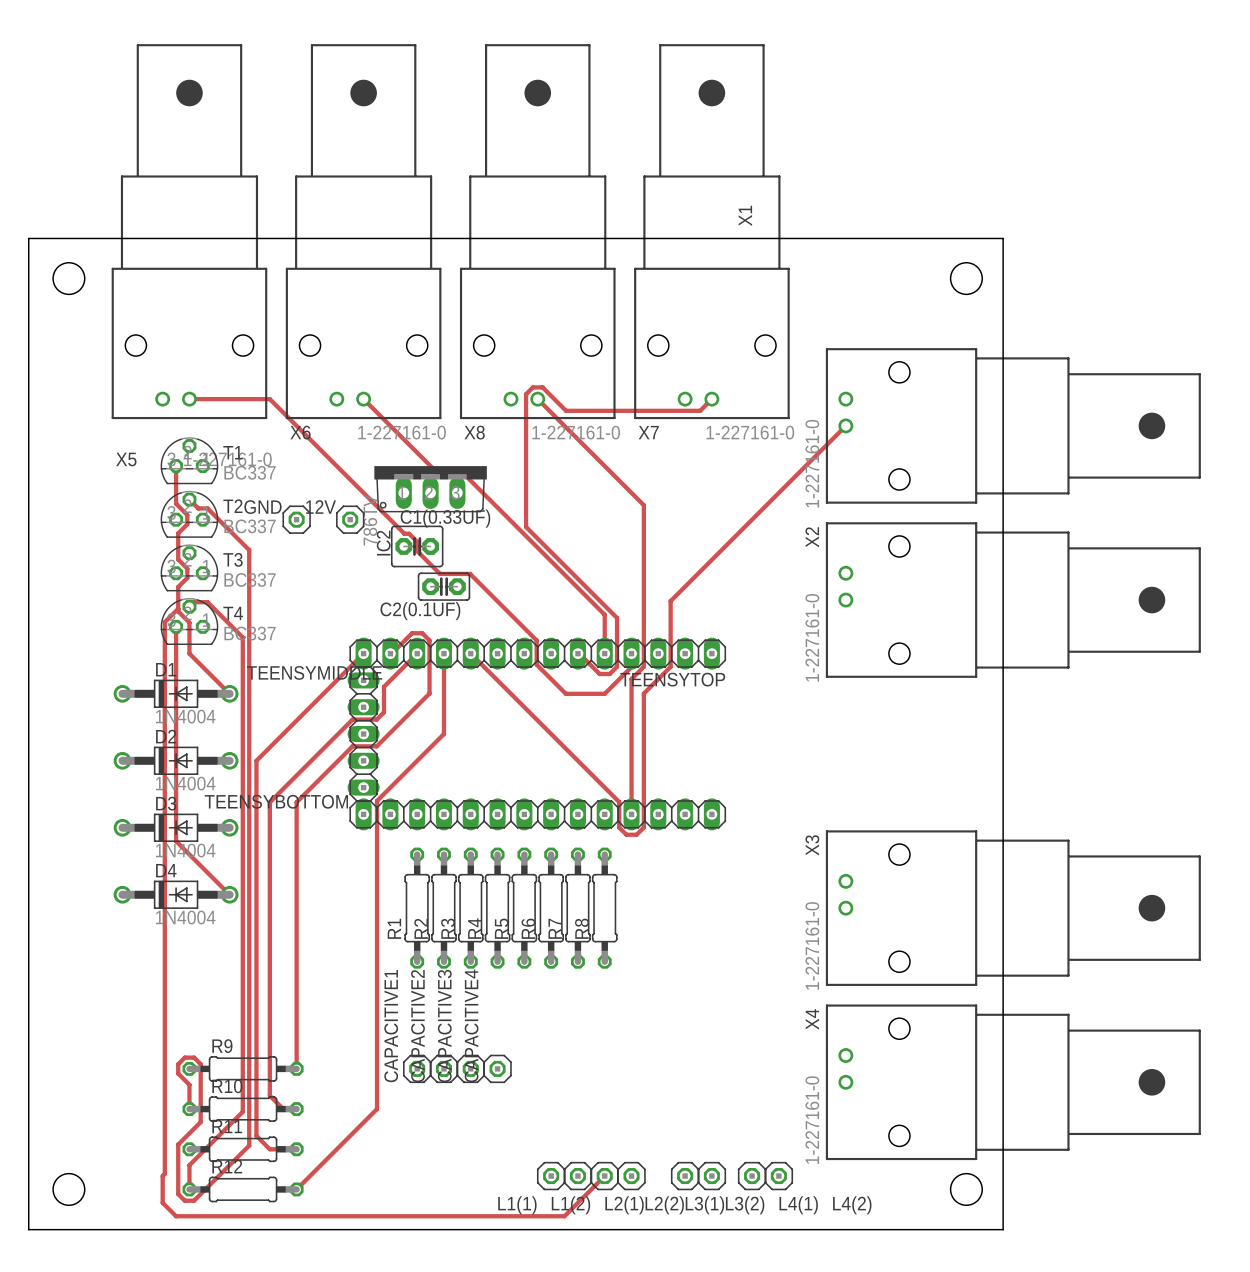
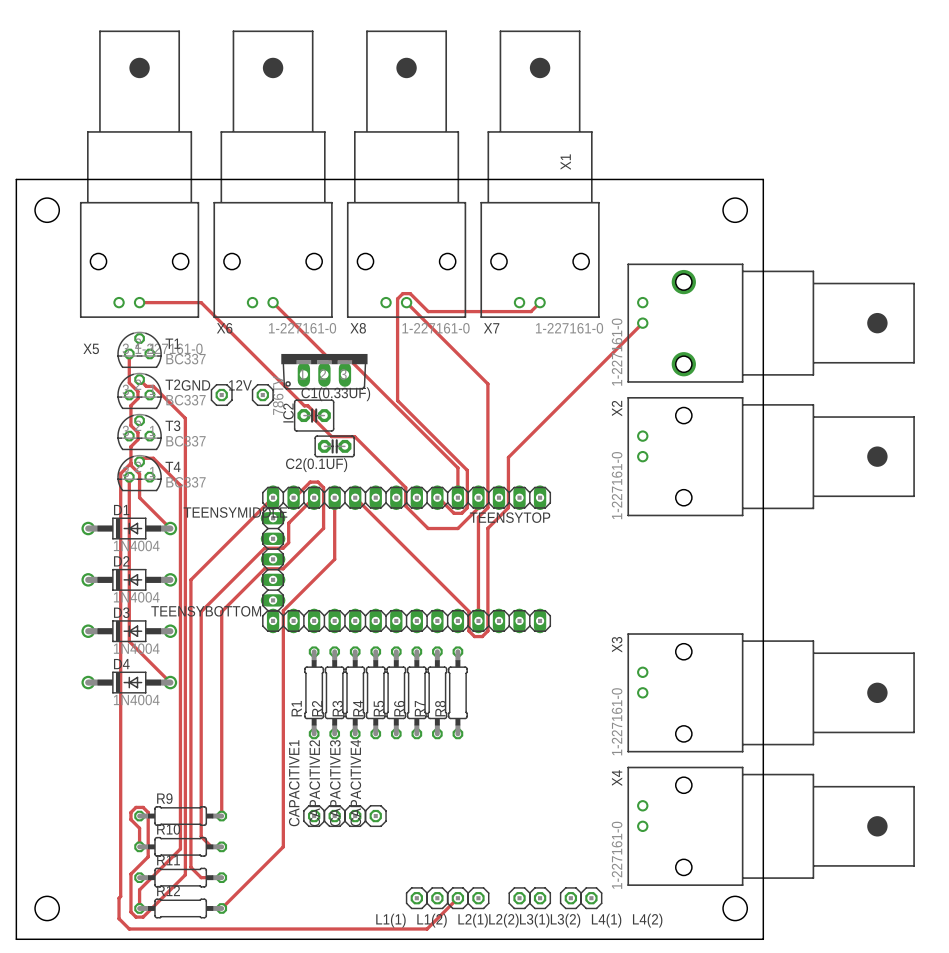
X1 footprint: [825, 348, 1201, 504] -> [627, 263, 915, 383]

